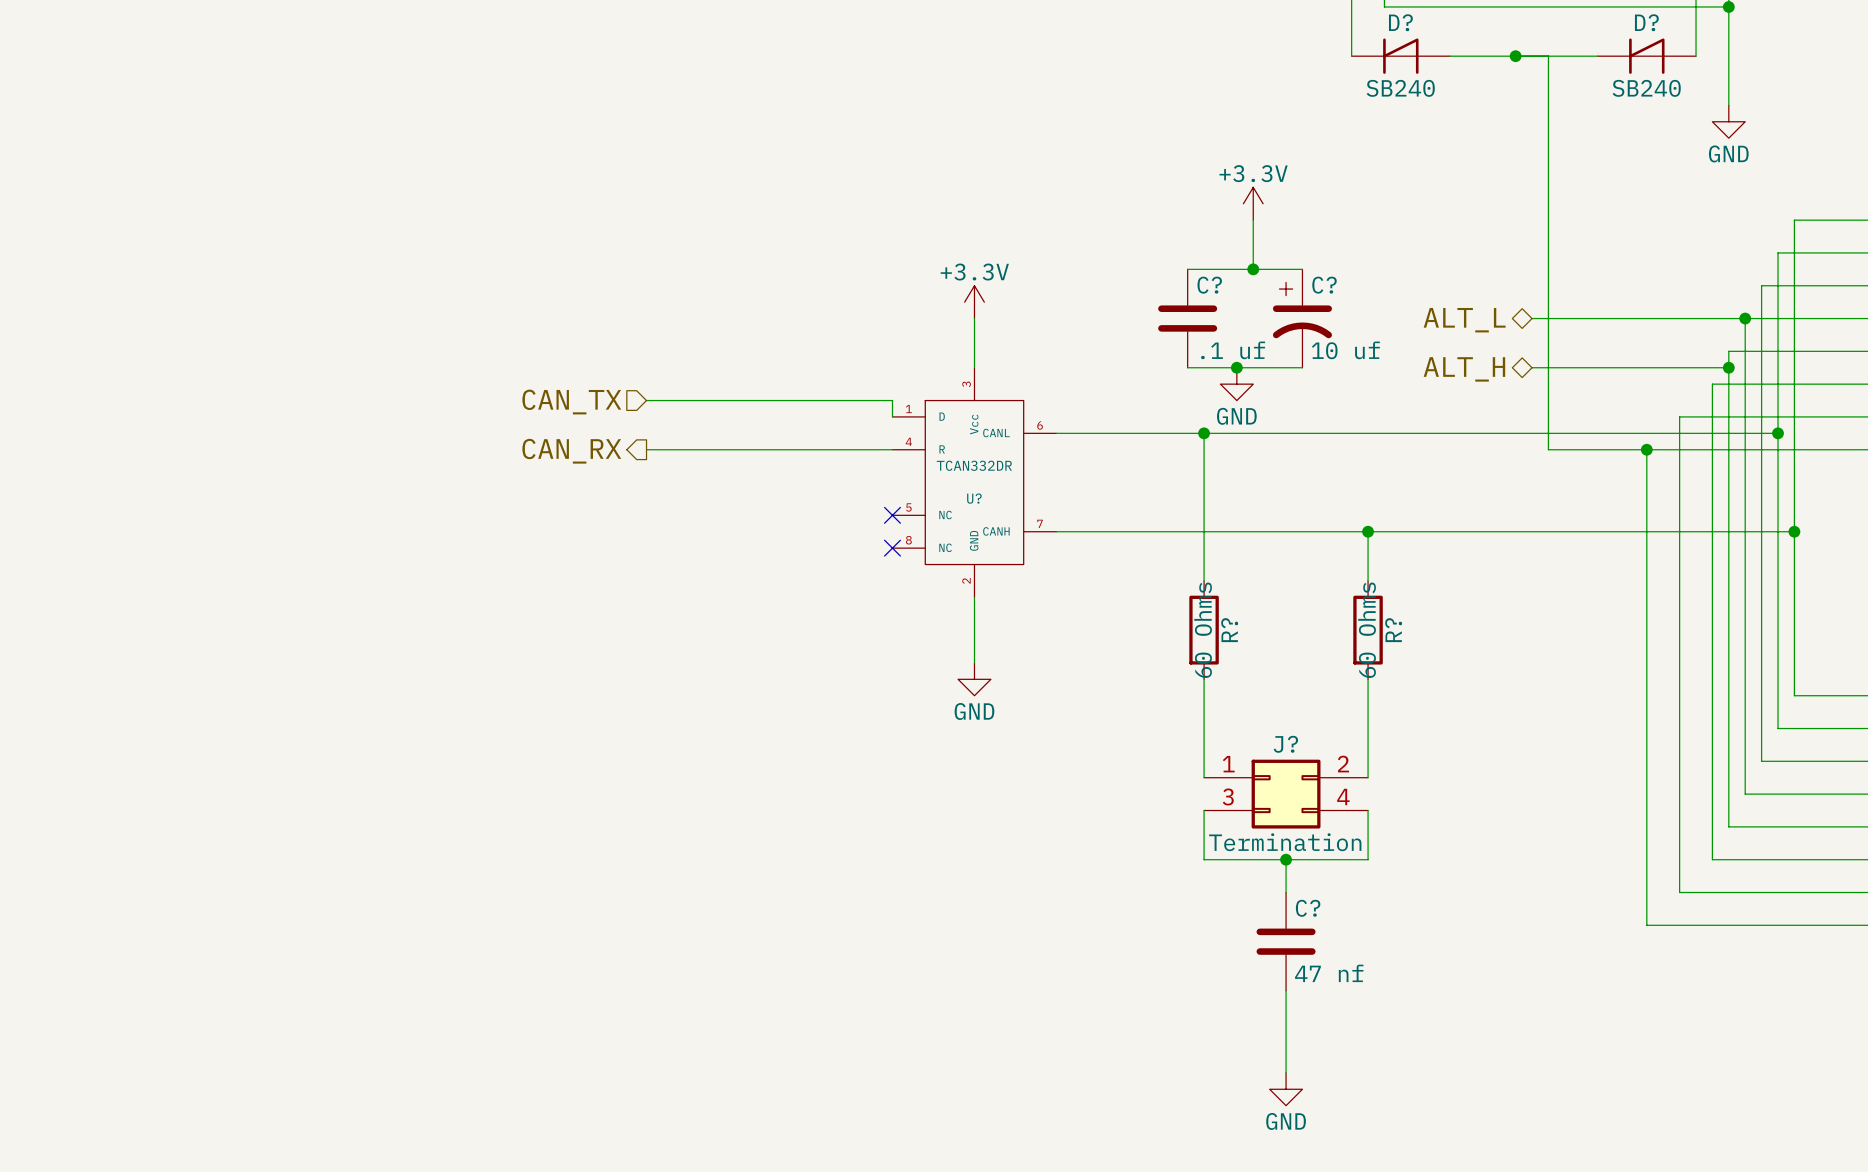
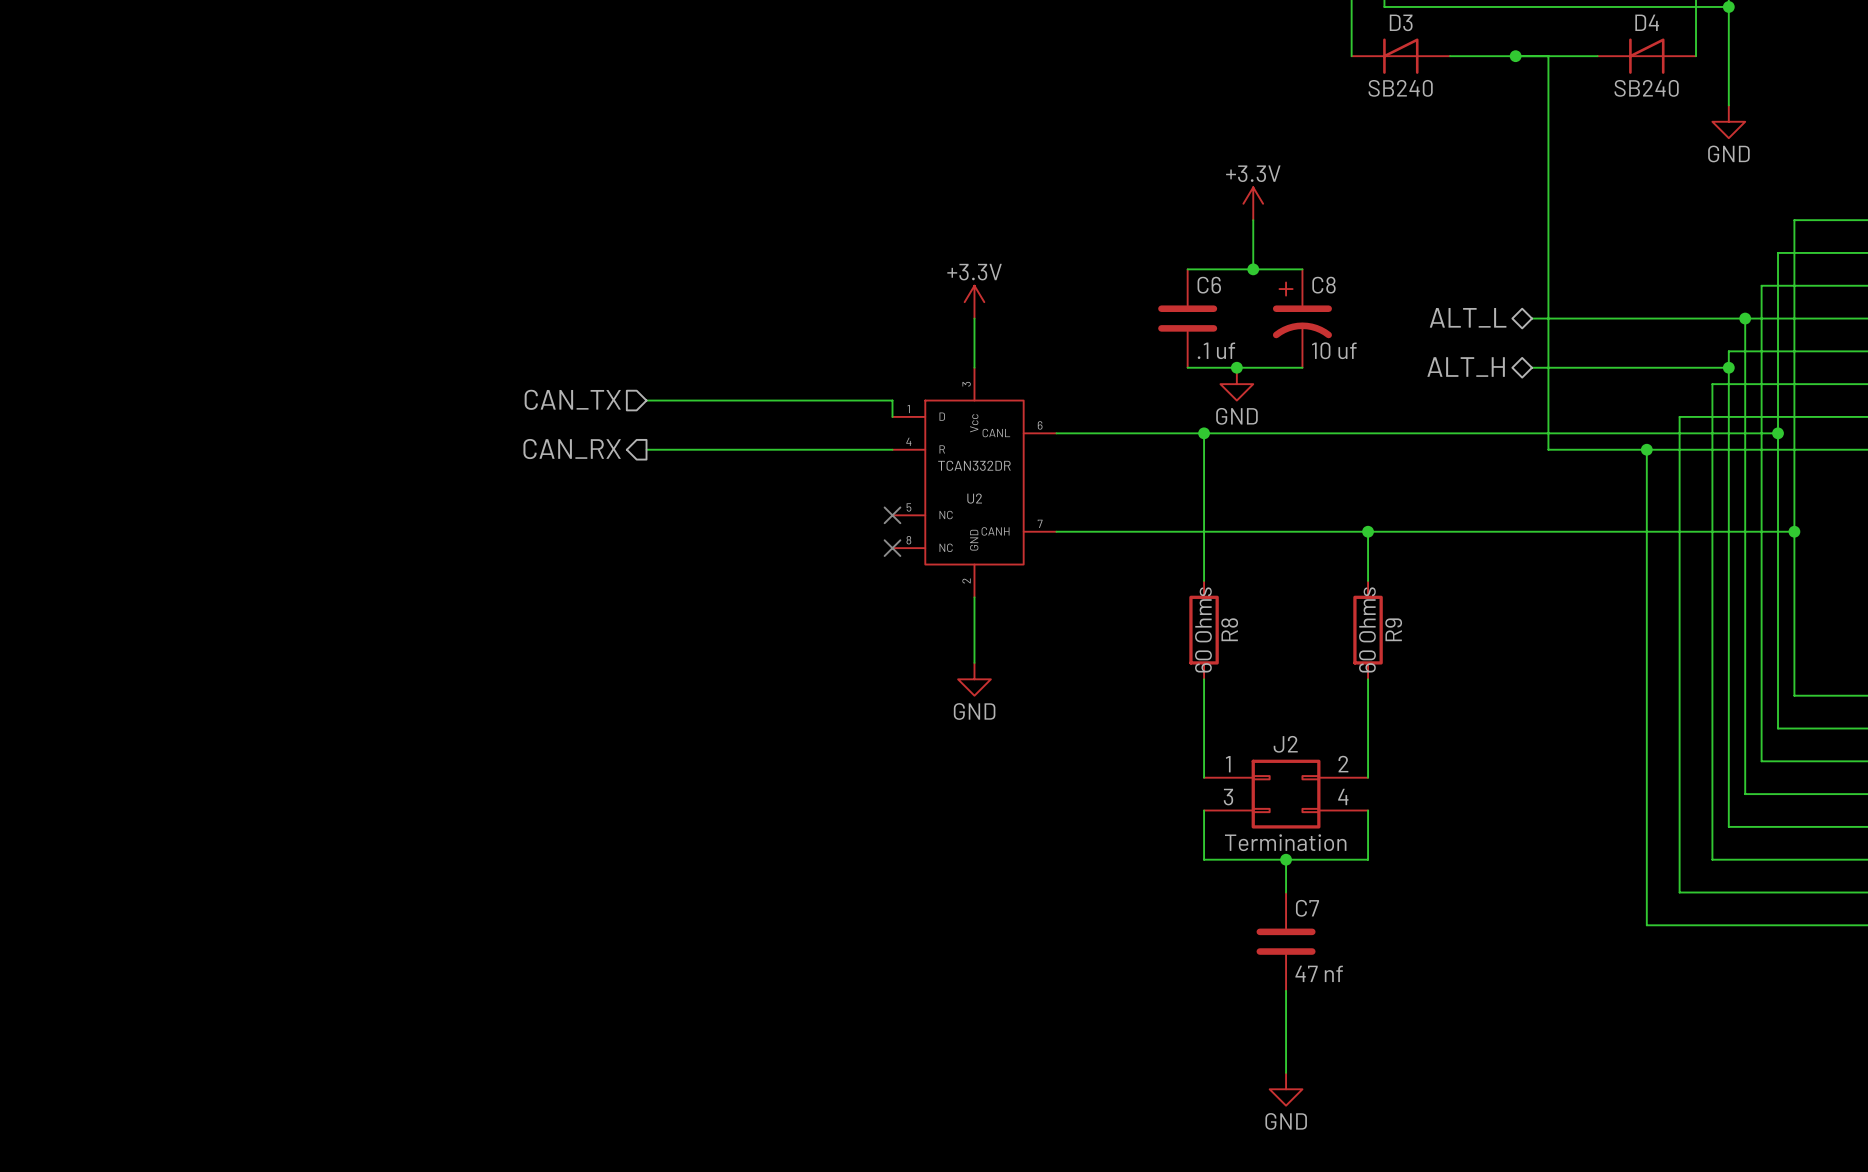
D? name: D? (1400, 22) -> D3 (1401, 22)
D? name: D? (1646, 22) -> D4 (1647, 22)
C? name: C? (1209, 285) -> C6 (1209, 285)
C? name: C? (1324, 285) -> C8 (1323, 285)
U? name: U? (974, 498) -> U2 (974, 498)
R? name: R? (1229, 630) -> R8 (1229, 629)
R? name: R? (1393, 630) -> R9 (1393, 629)
J? name: J? (1285, 744) -> J2 (1285, 744)
C? name: C? (1308, 908) -> C7 (1307, 908)

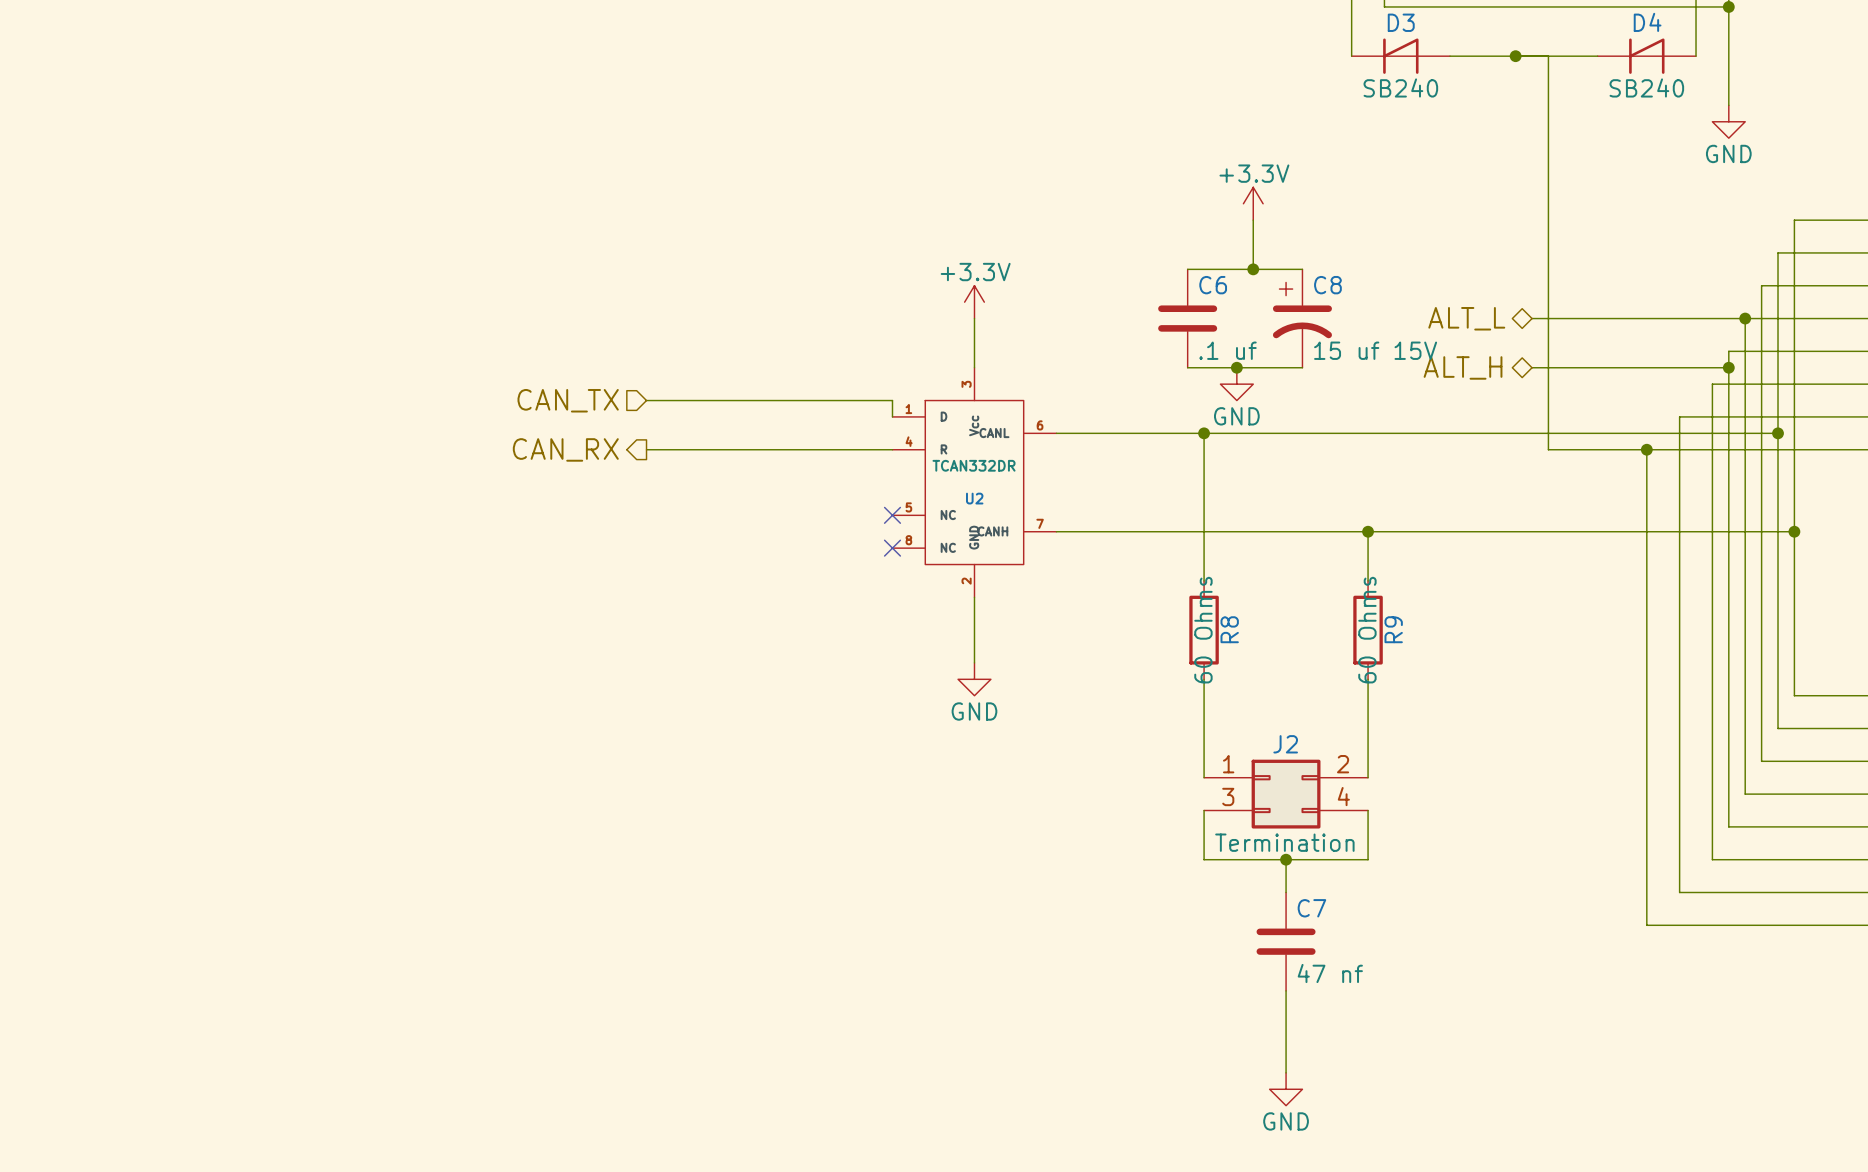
C8 value: 10 uf (1334, 350) -> 15 uf 15V (1375, 350)

